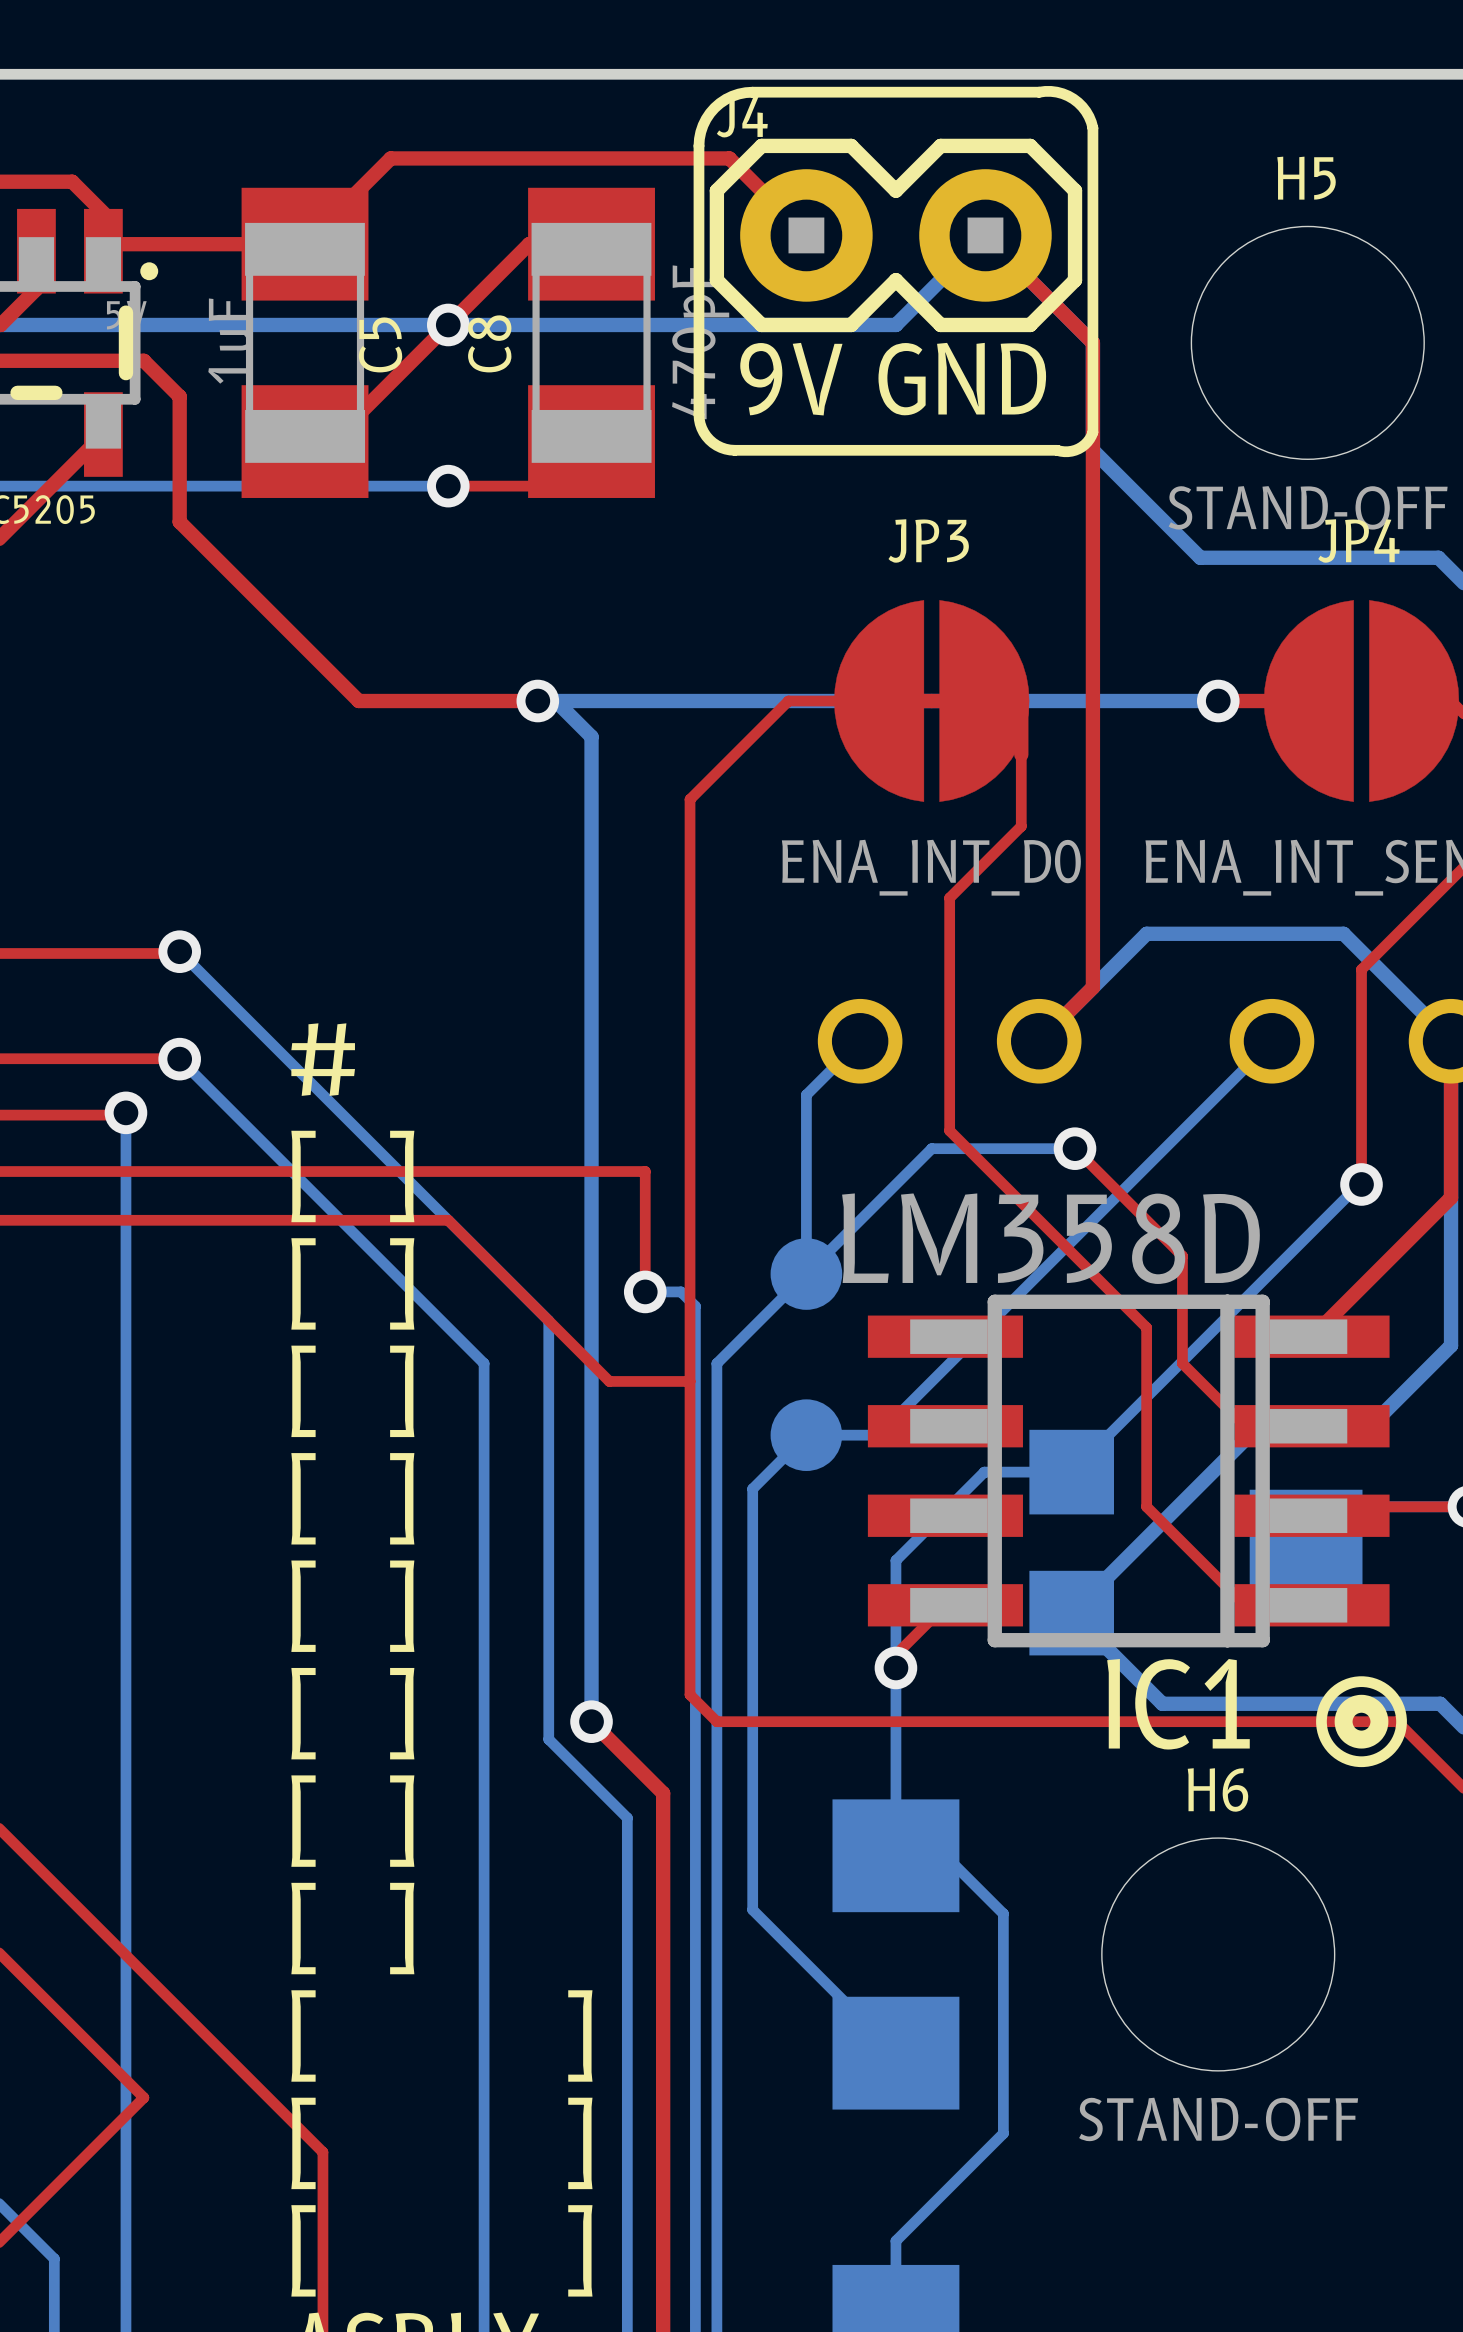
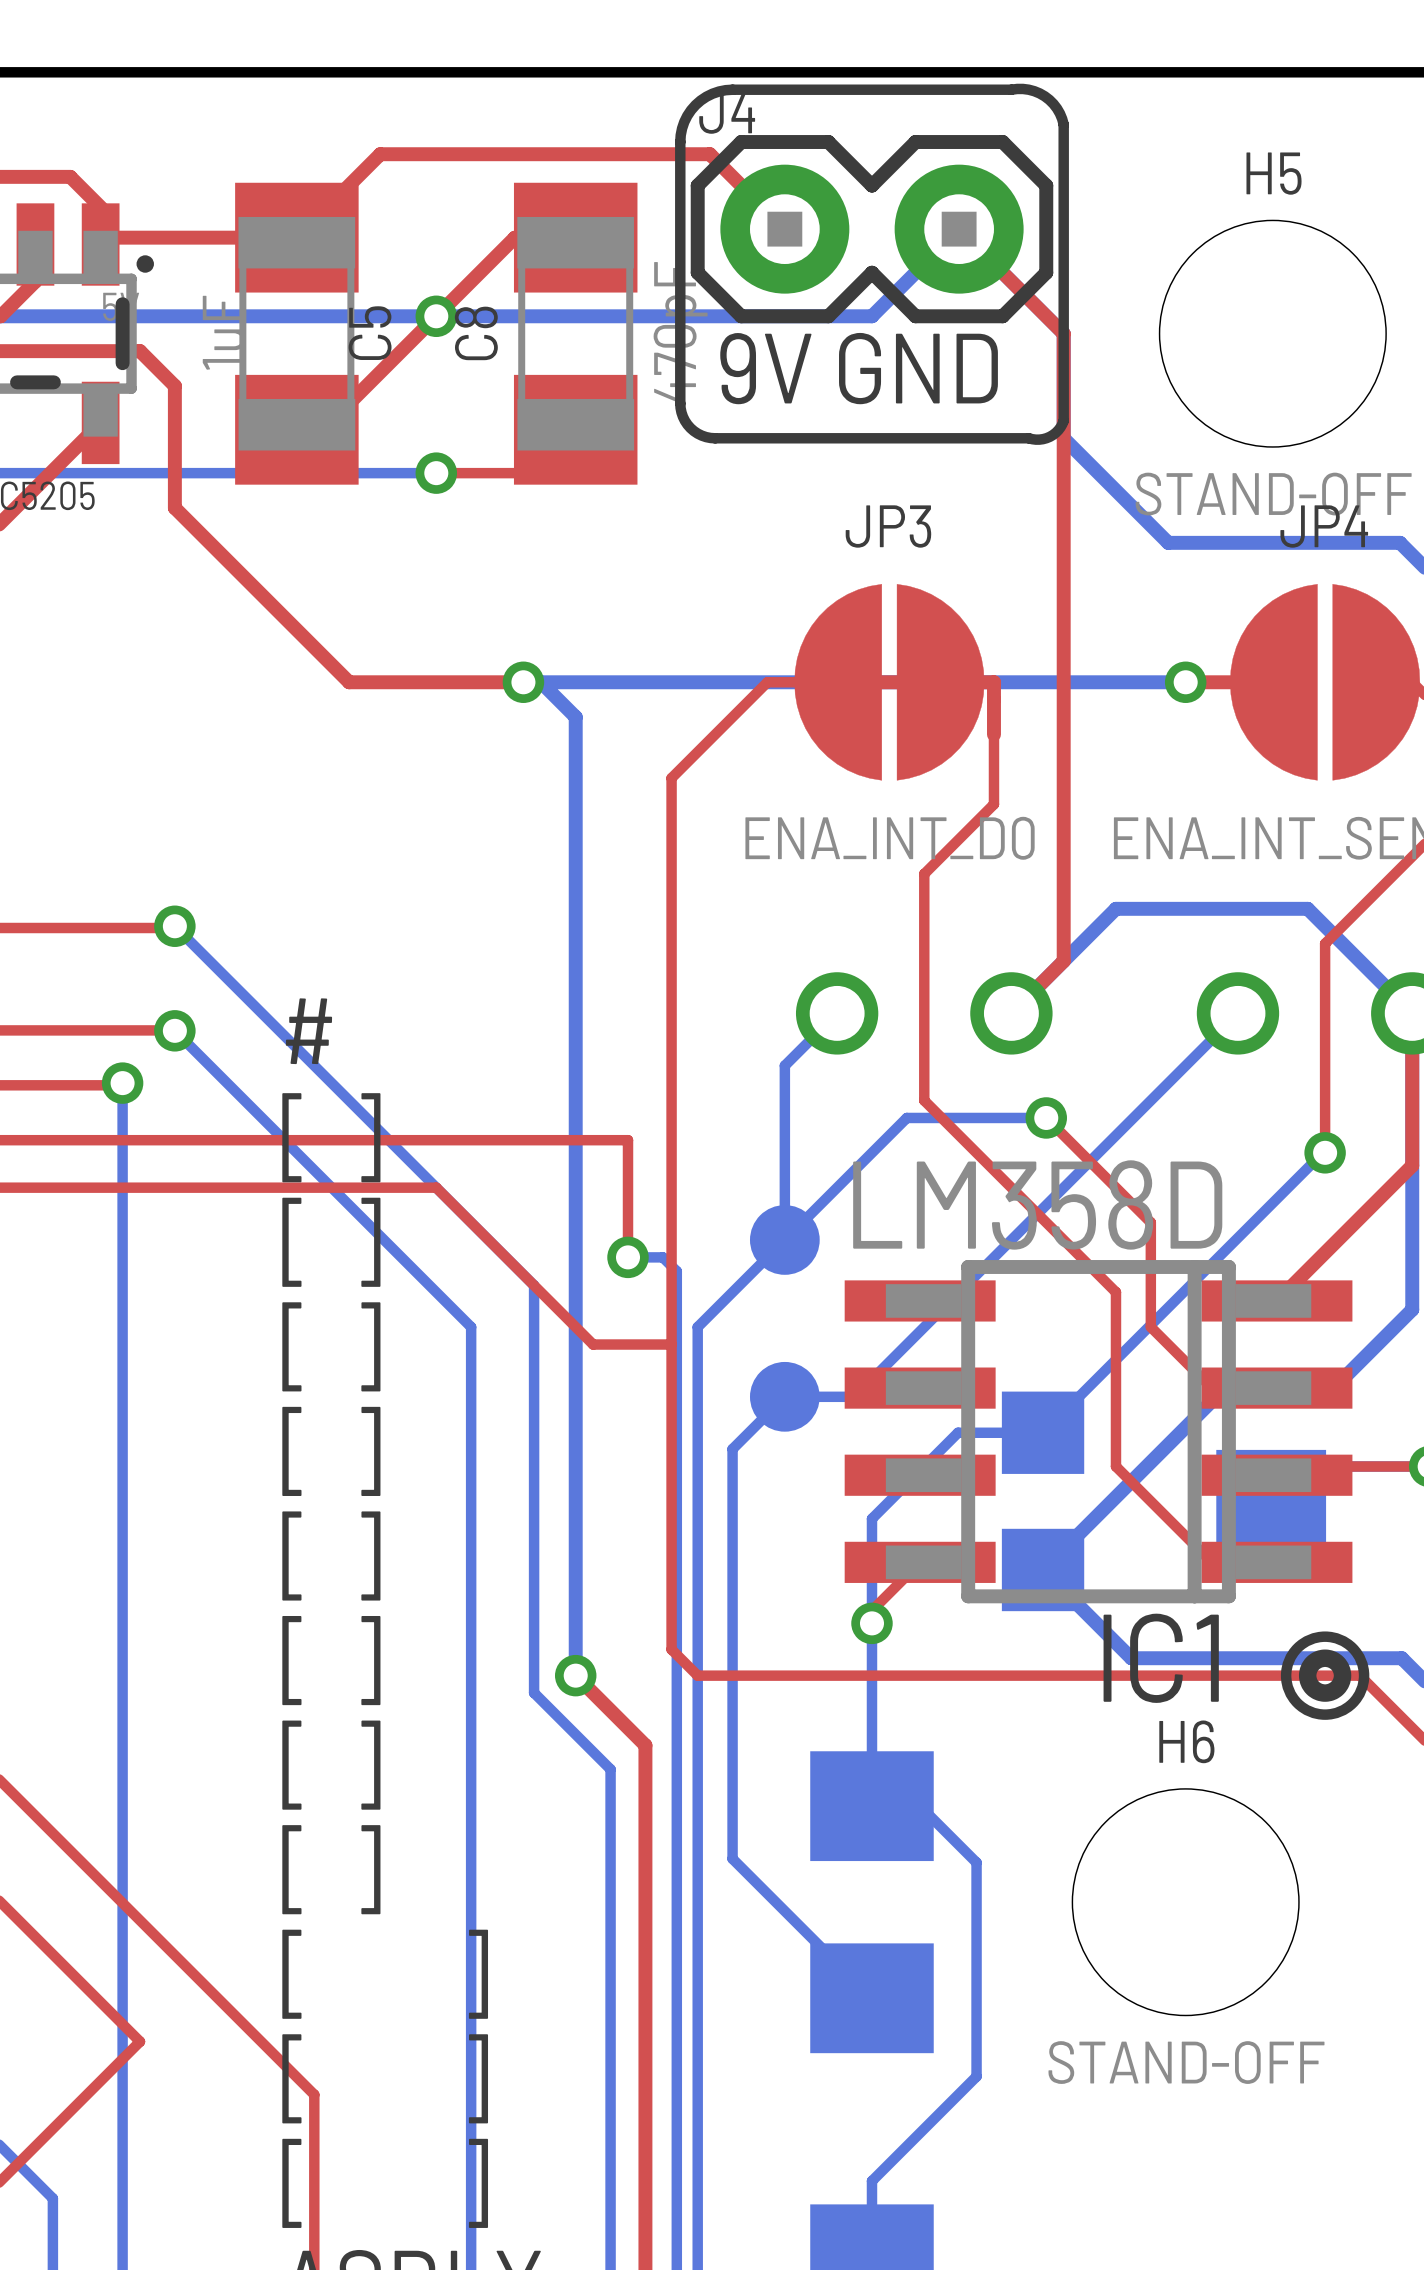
JP3 position: (931, 701) -> (889, 682)

